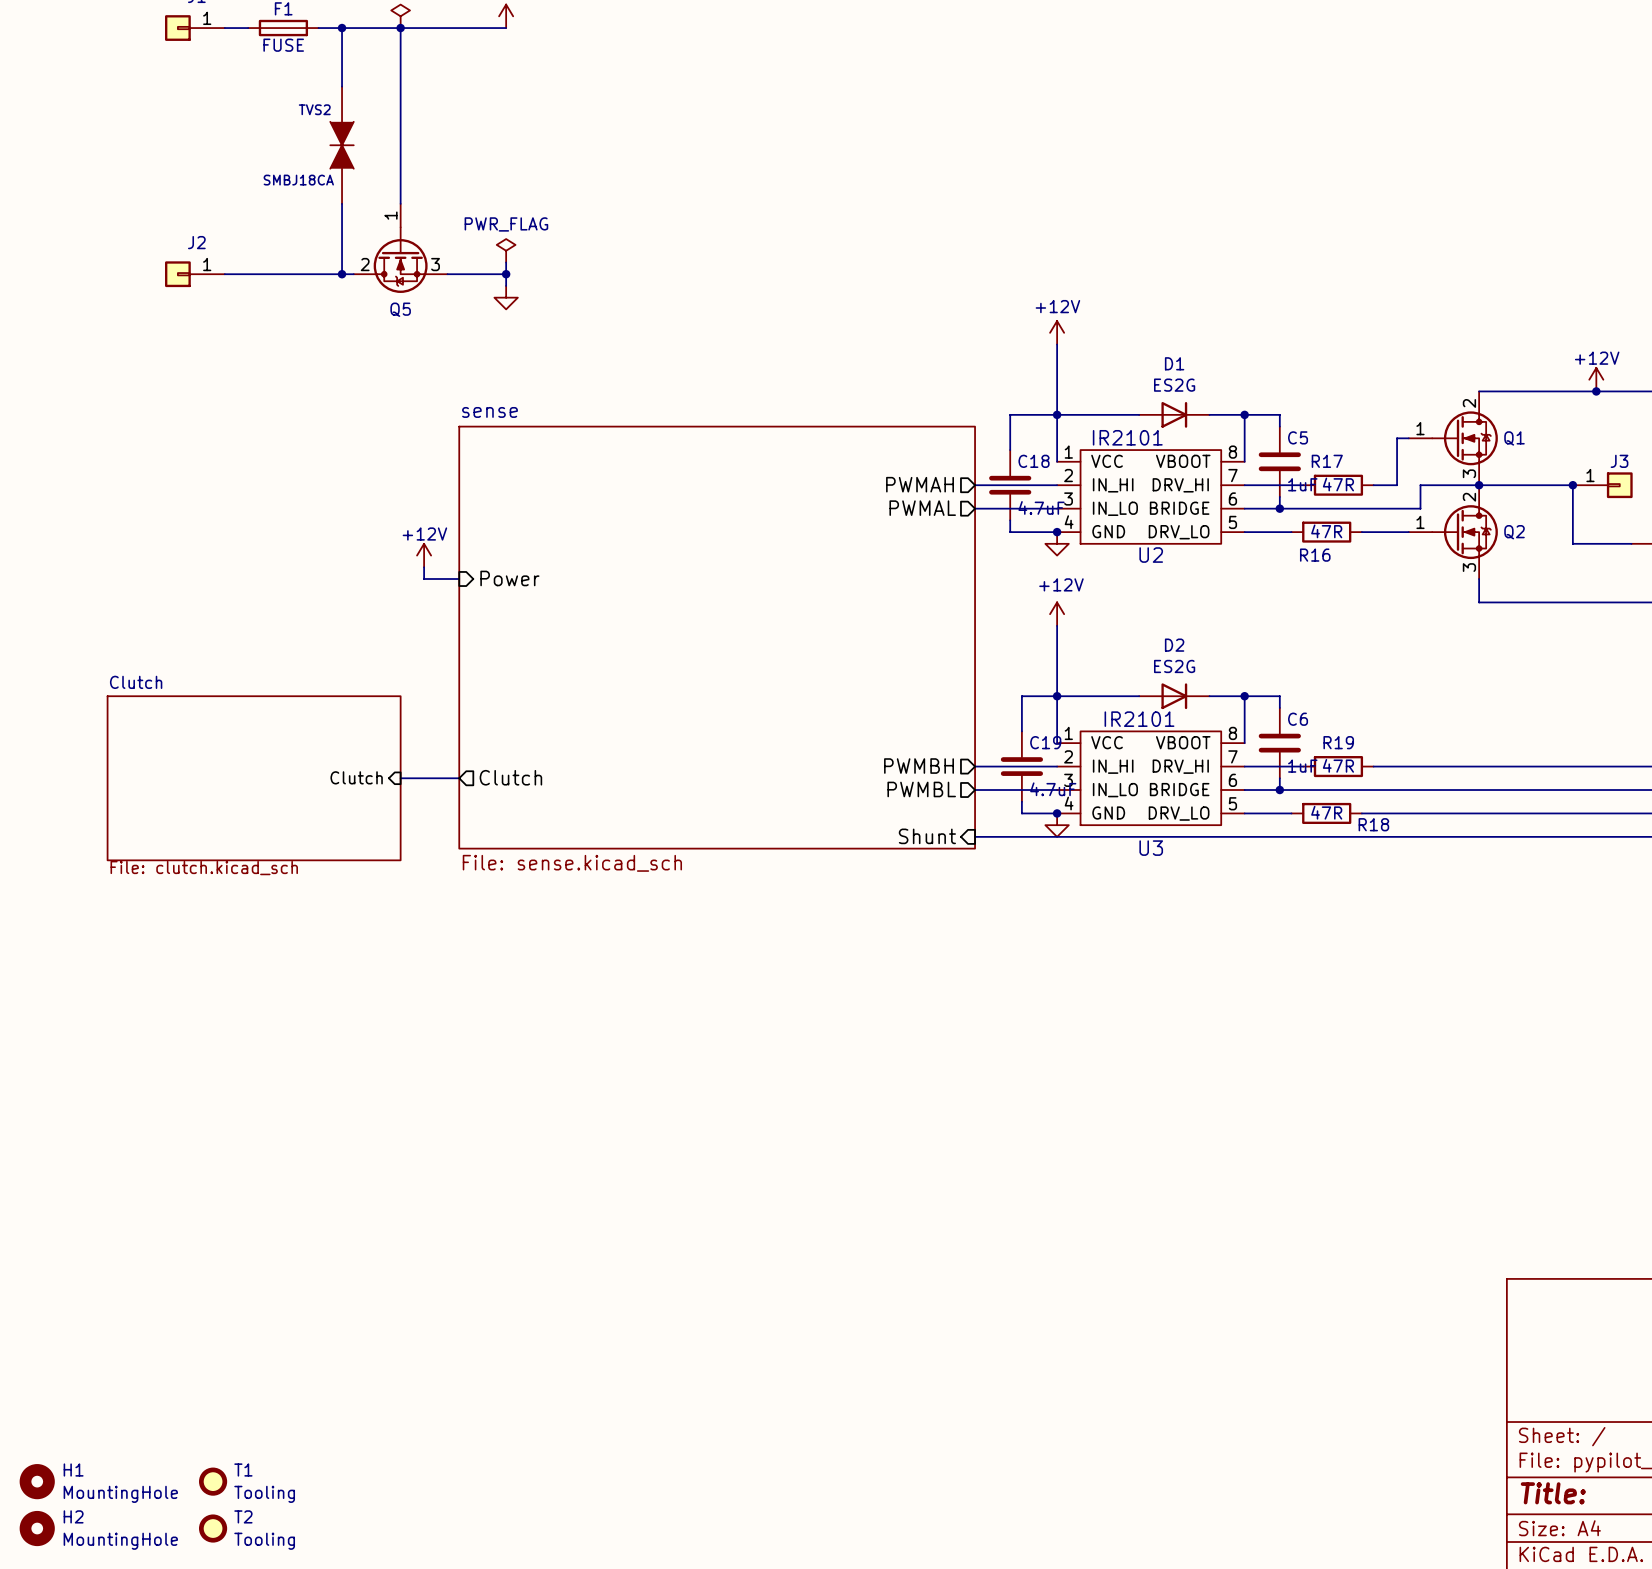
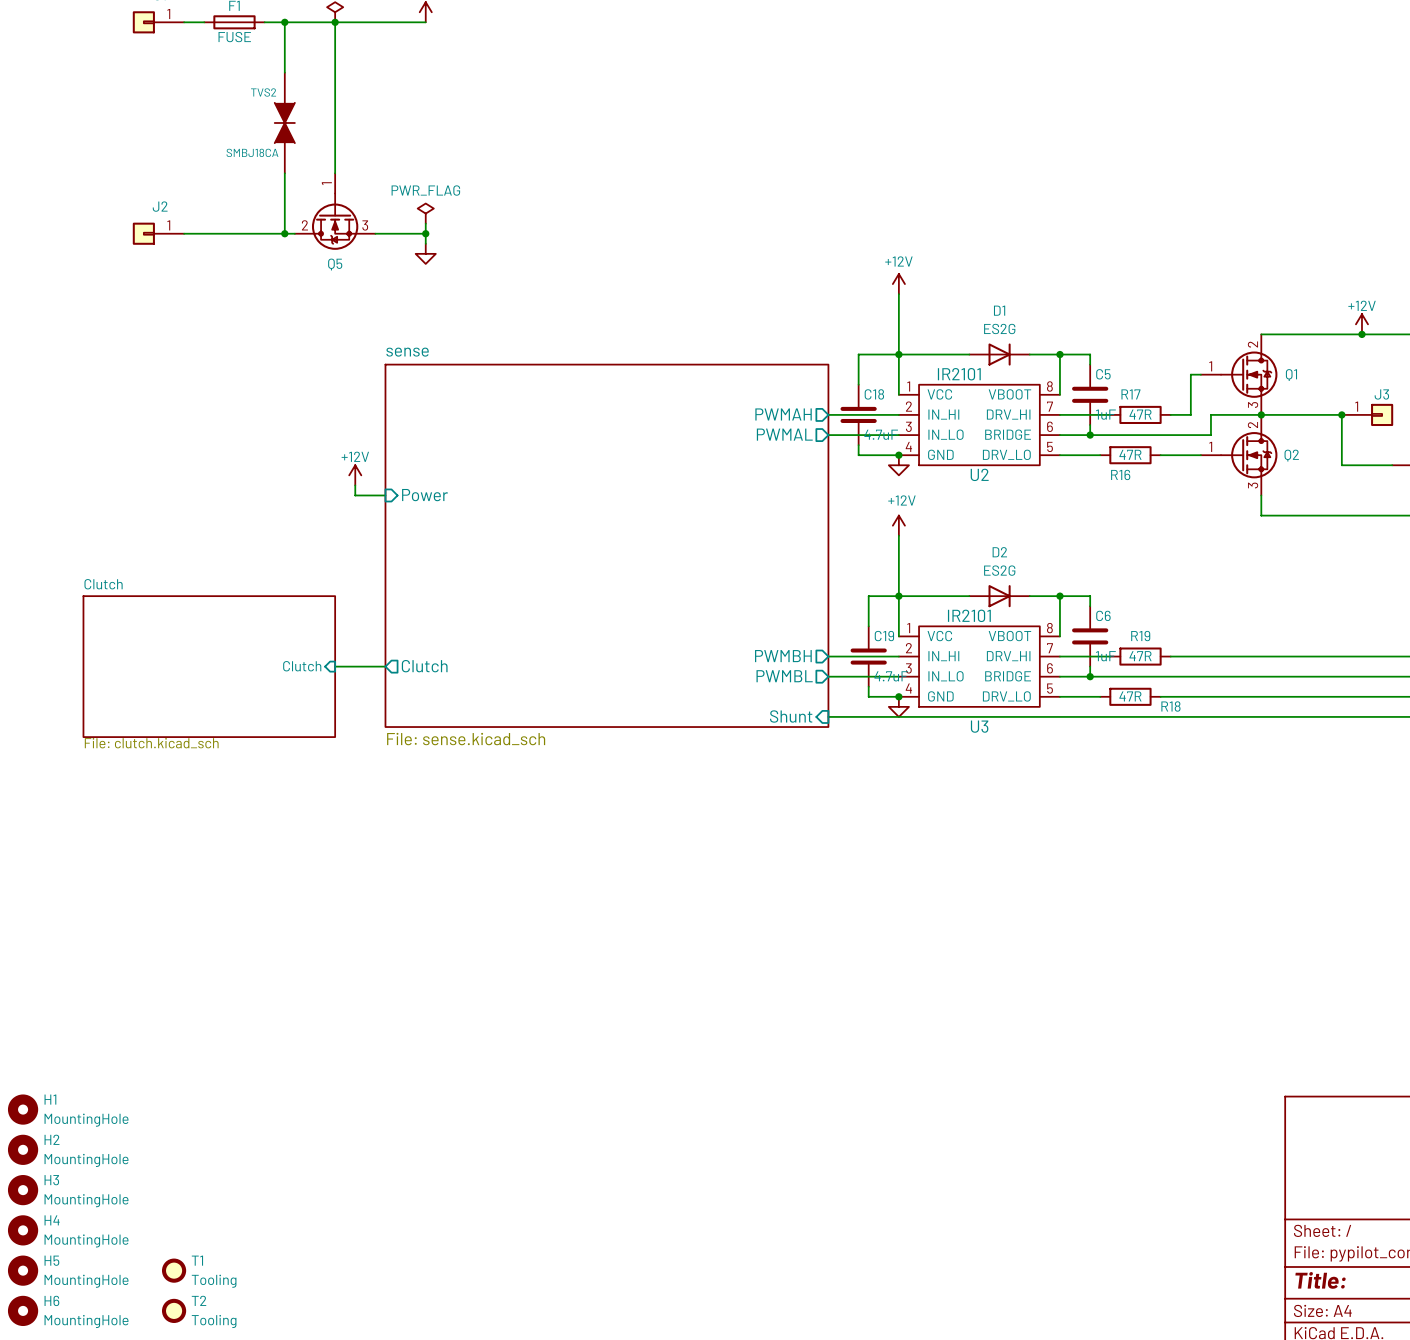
H1: none -> MountingHole (23, 1109)
H2: none -> MountingHole (23, 1149)
H3: none -> MountingHole (23, 1190)
H4: none -> MountingHole (23, 1230)
H1 name: H1 (73, 1470) -> H5 (51, 1260)
H2 name: H2 (73, 1516) -> H6 (51, 1300)

